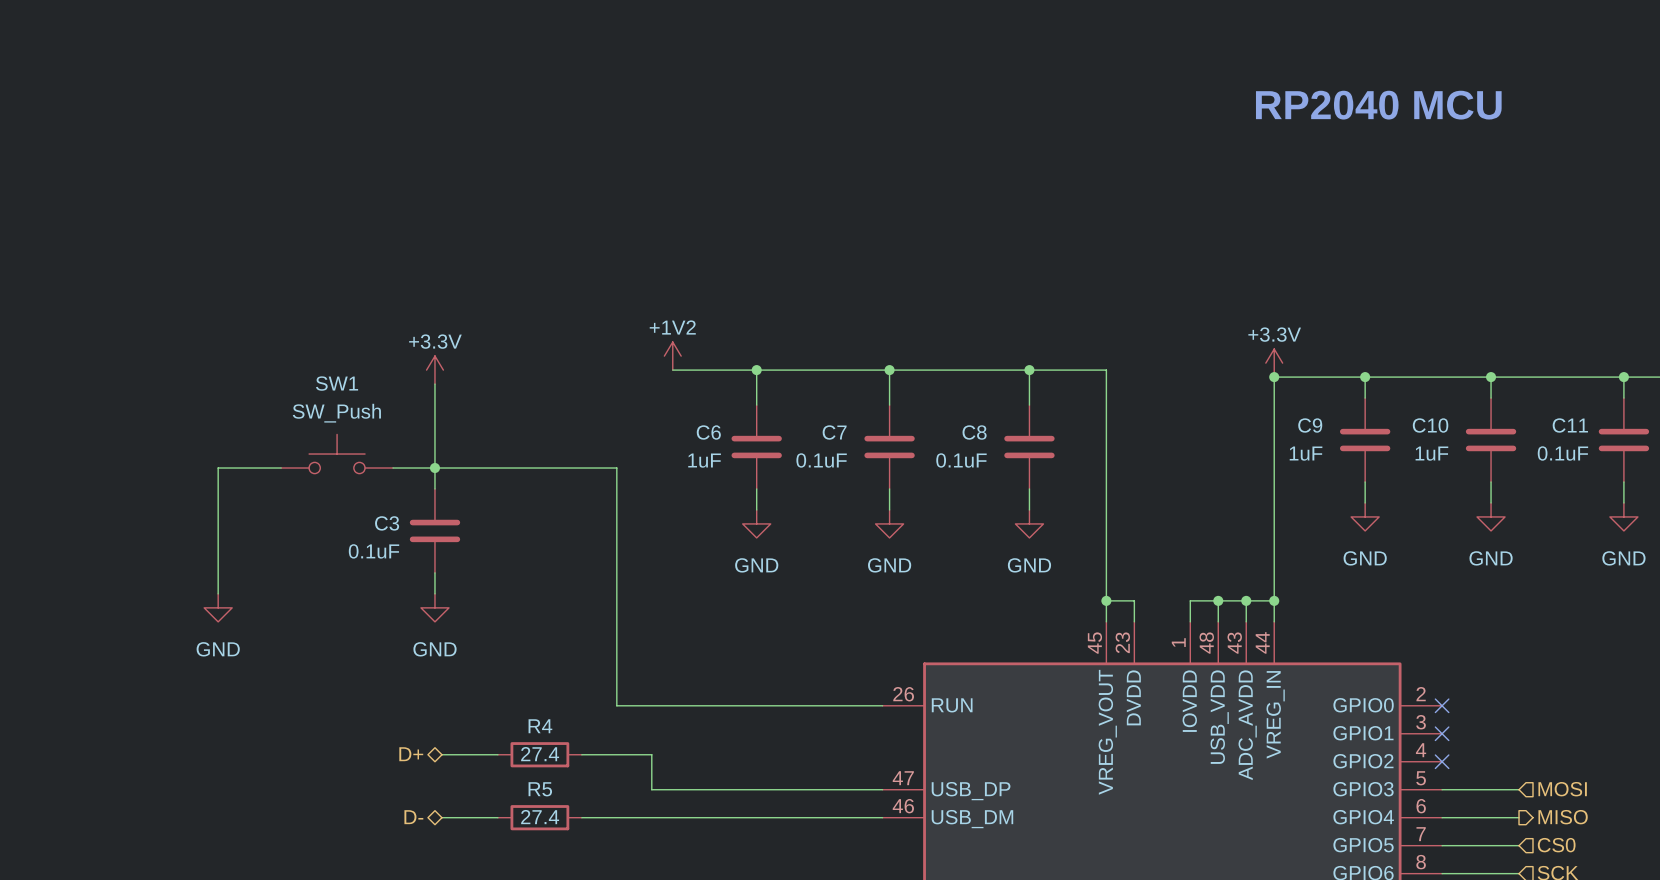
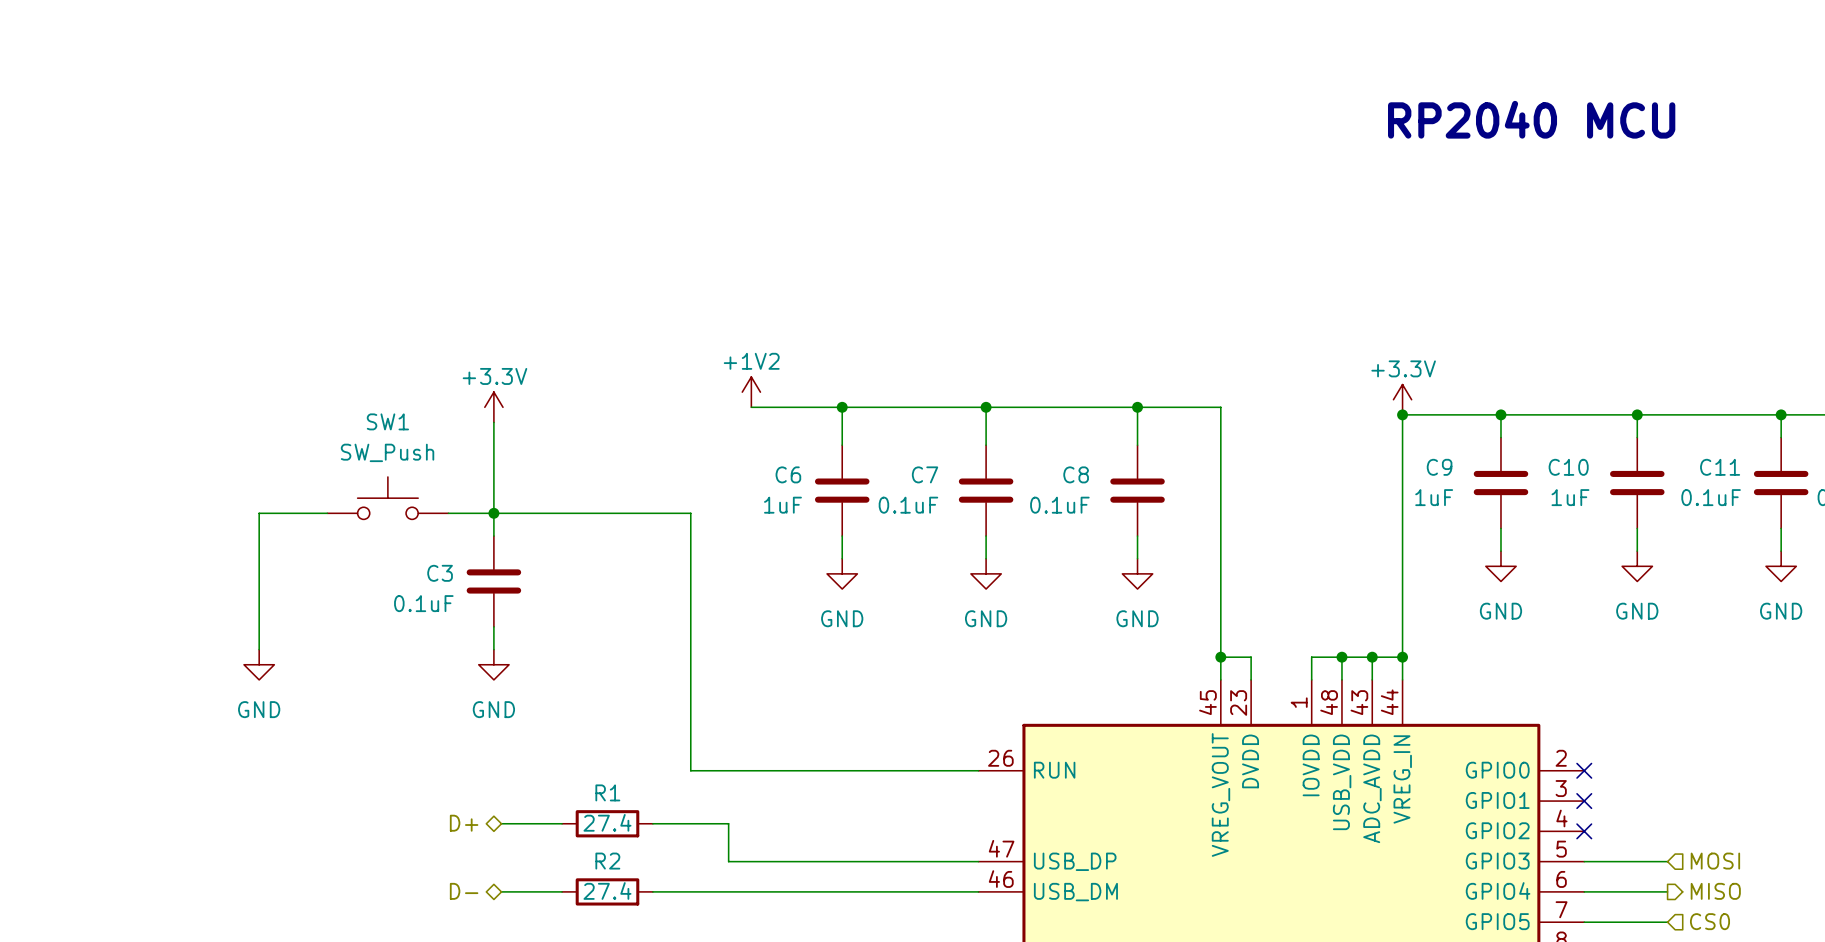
R4 name: R4 (540, 726) -> R1 (607, 792)
R5 name: R5 (540, 789) -> R2 (607, 861)

